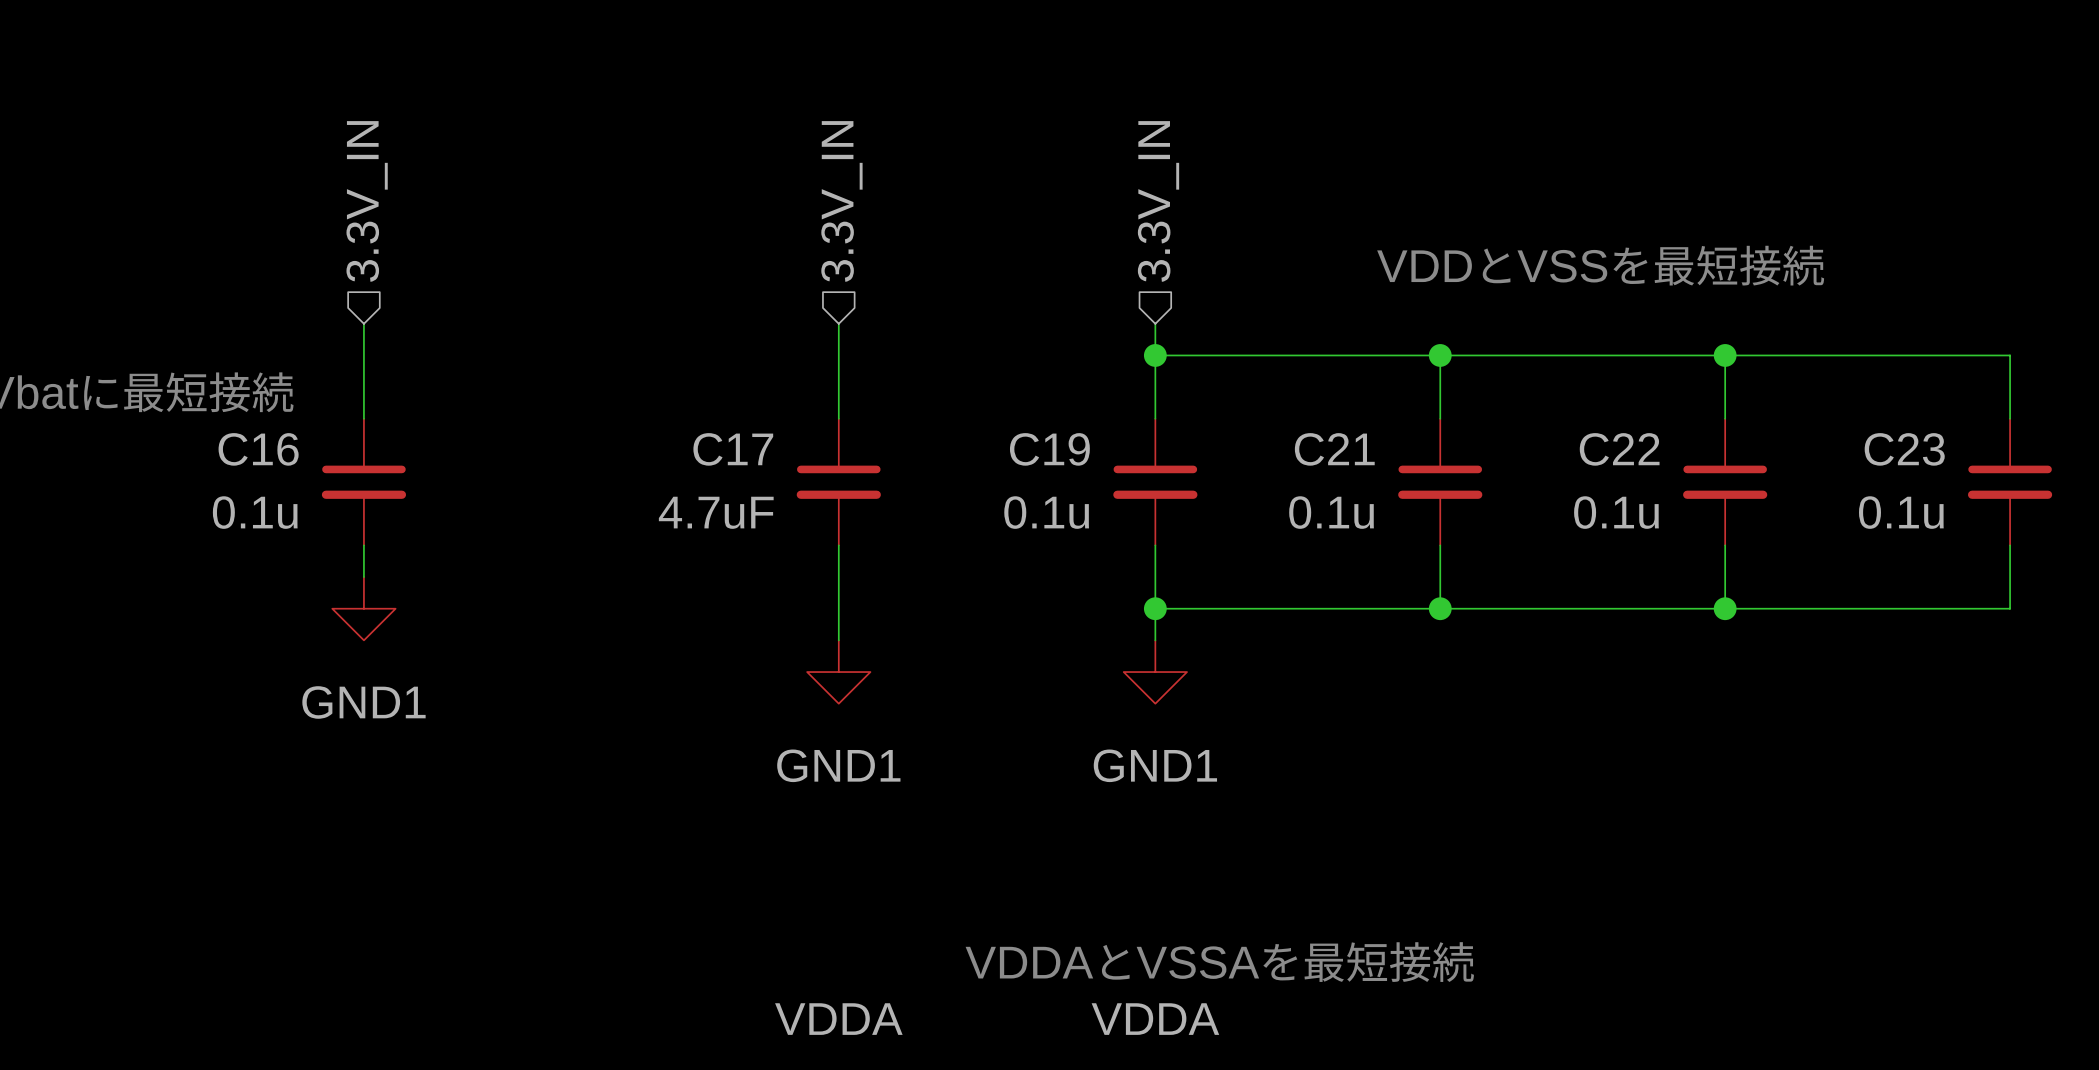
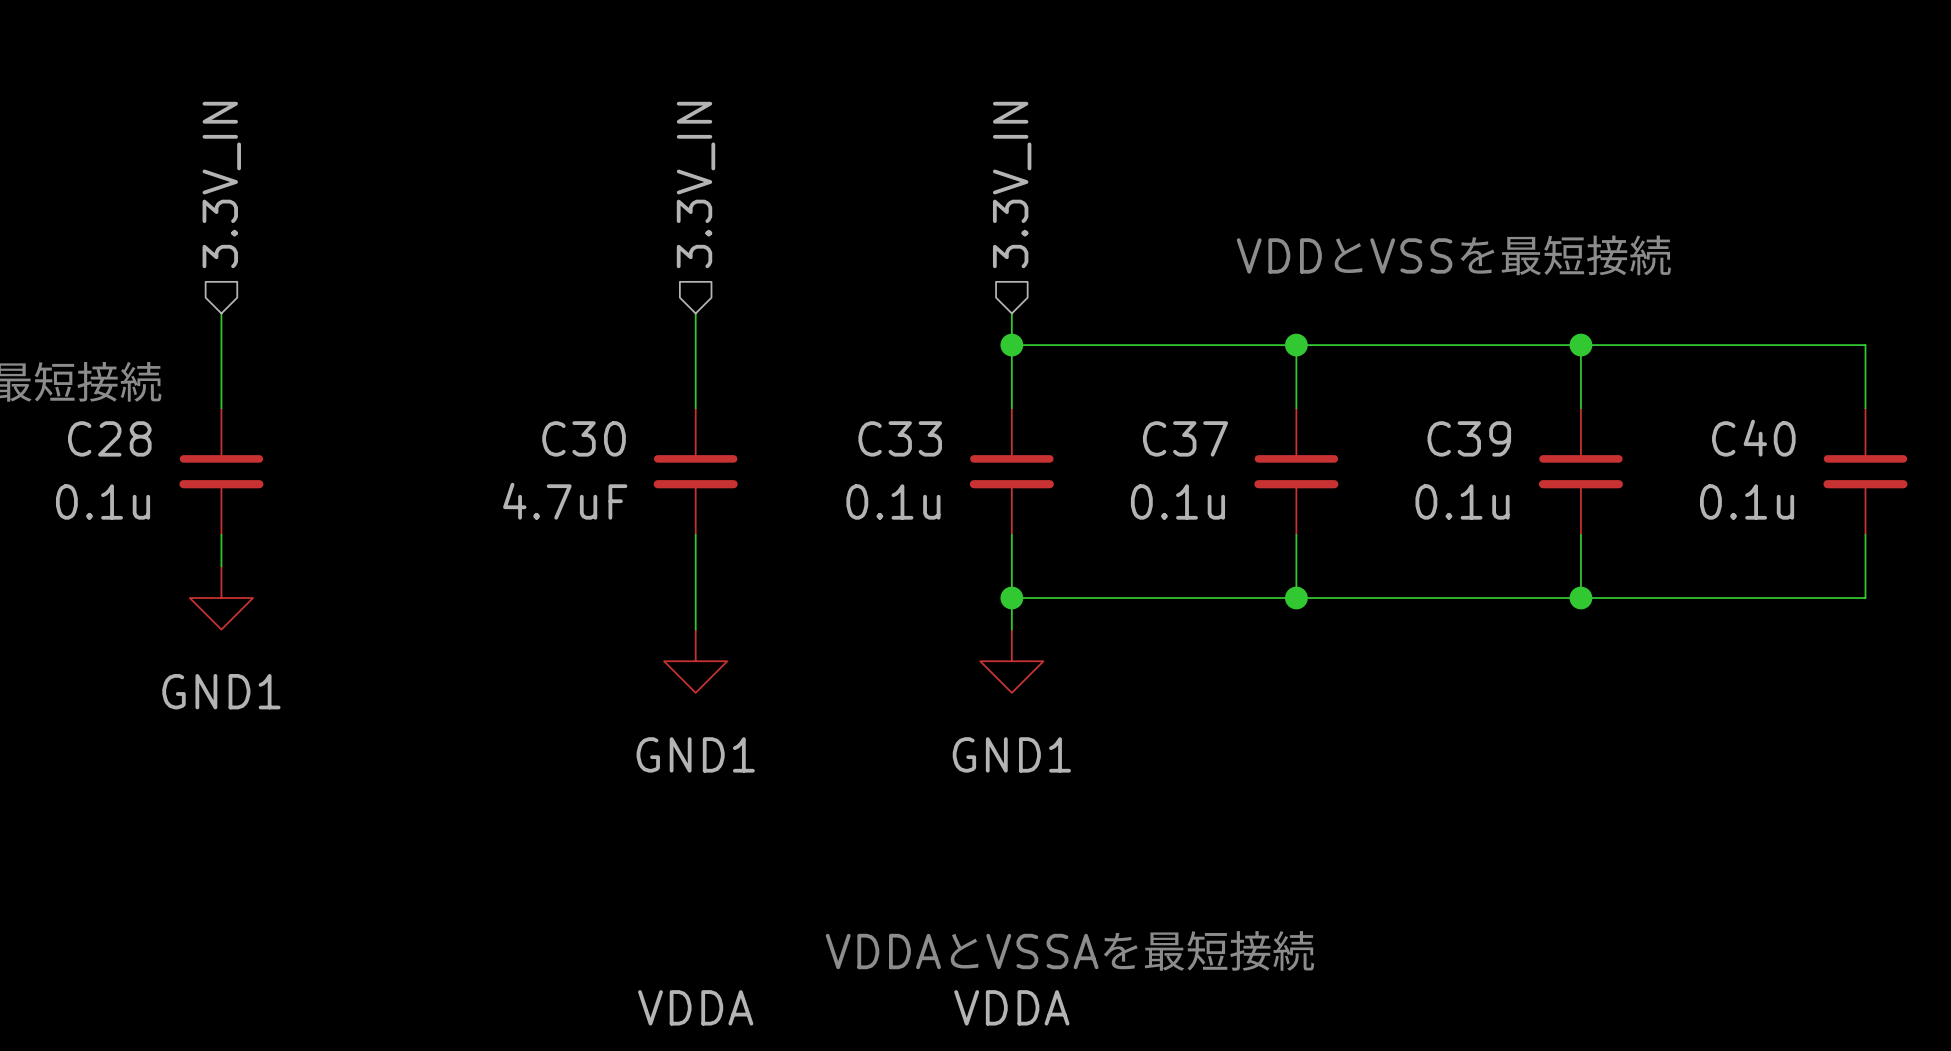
C16 name: C16 (258, 449) -> C28 (109, 438)
C17 name: C17 (733, 449) -> C30 (584, 438)
C19 name: C19 (1049, 449) -> C33 (900, 438)
C21 name: C21 (1334, 449) -> C37 (1185, 438)
C22 name: C22 (1619, 449) -> C39 (1469, 438)
C23 name: C23 (1904, 449) -> C40 (1753, 438)

